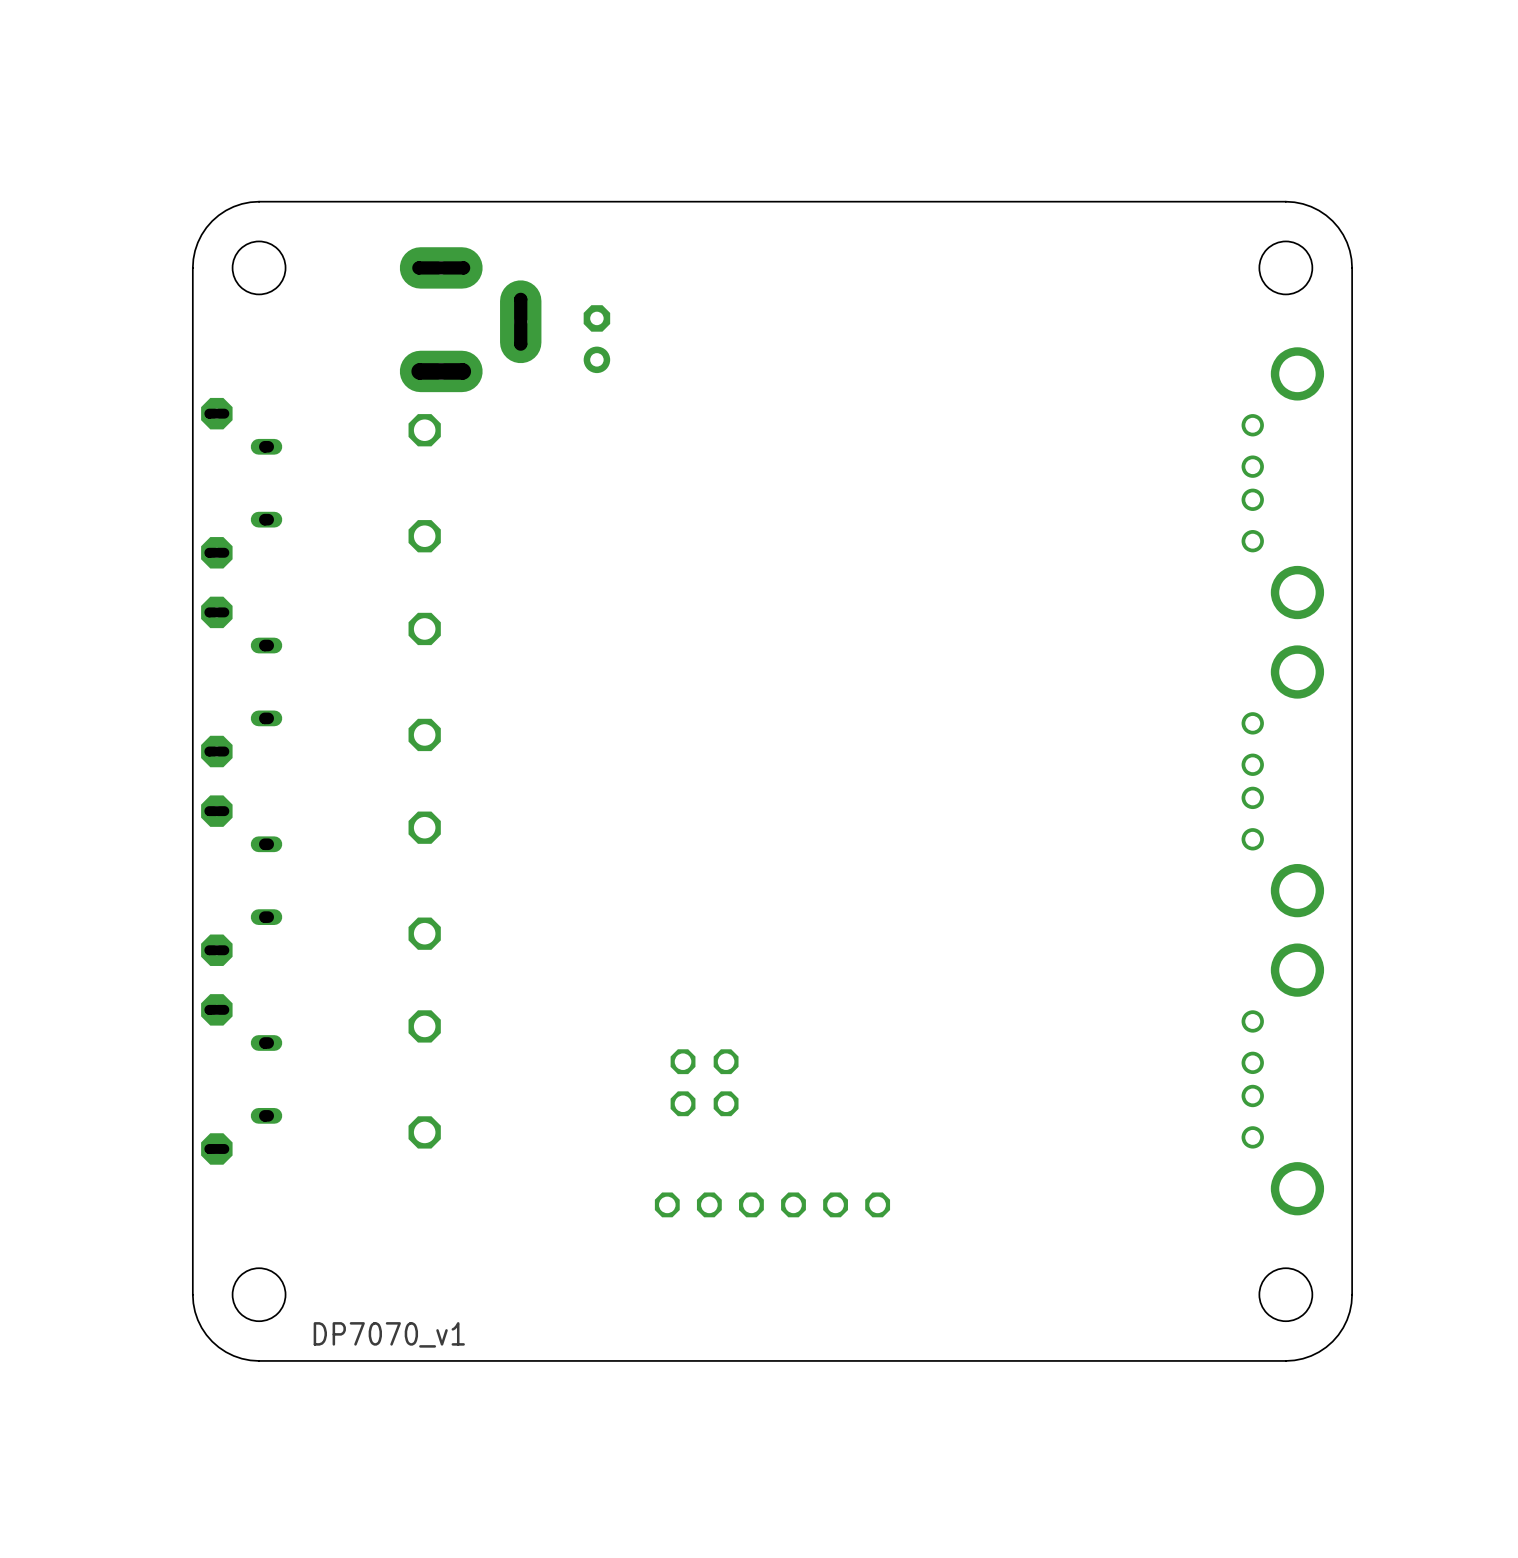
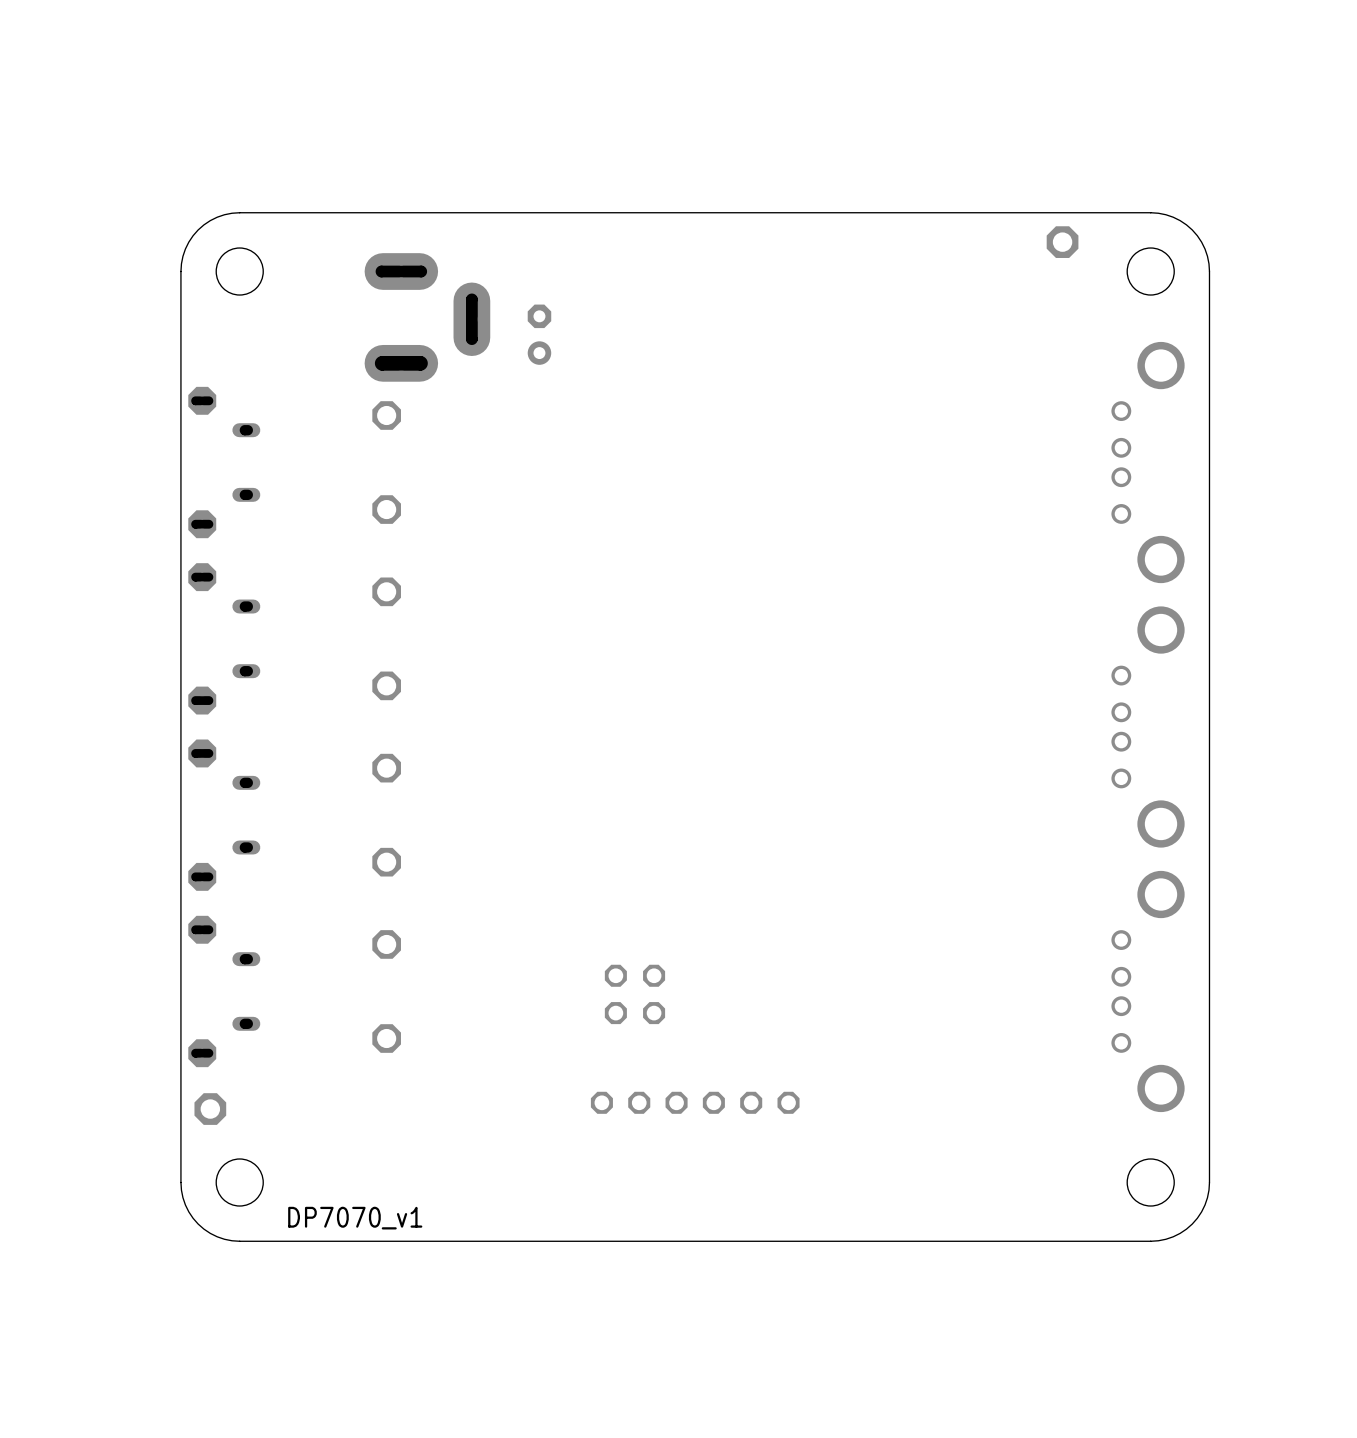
part: none -> (1062, 242)
part: none -> (210, 1109)

